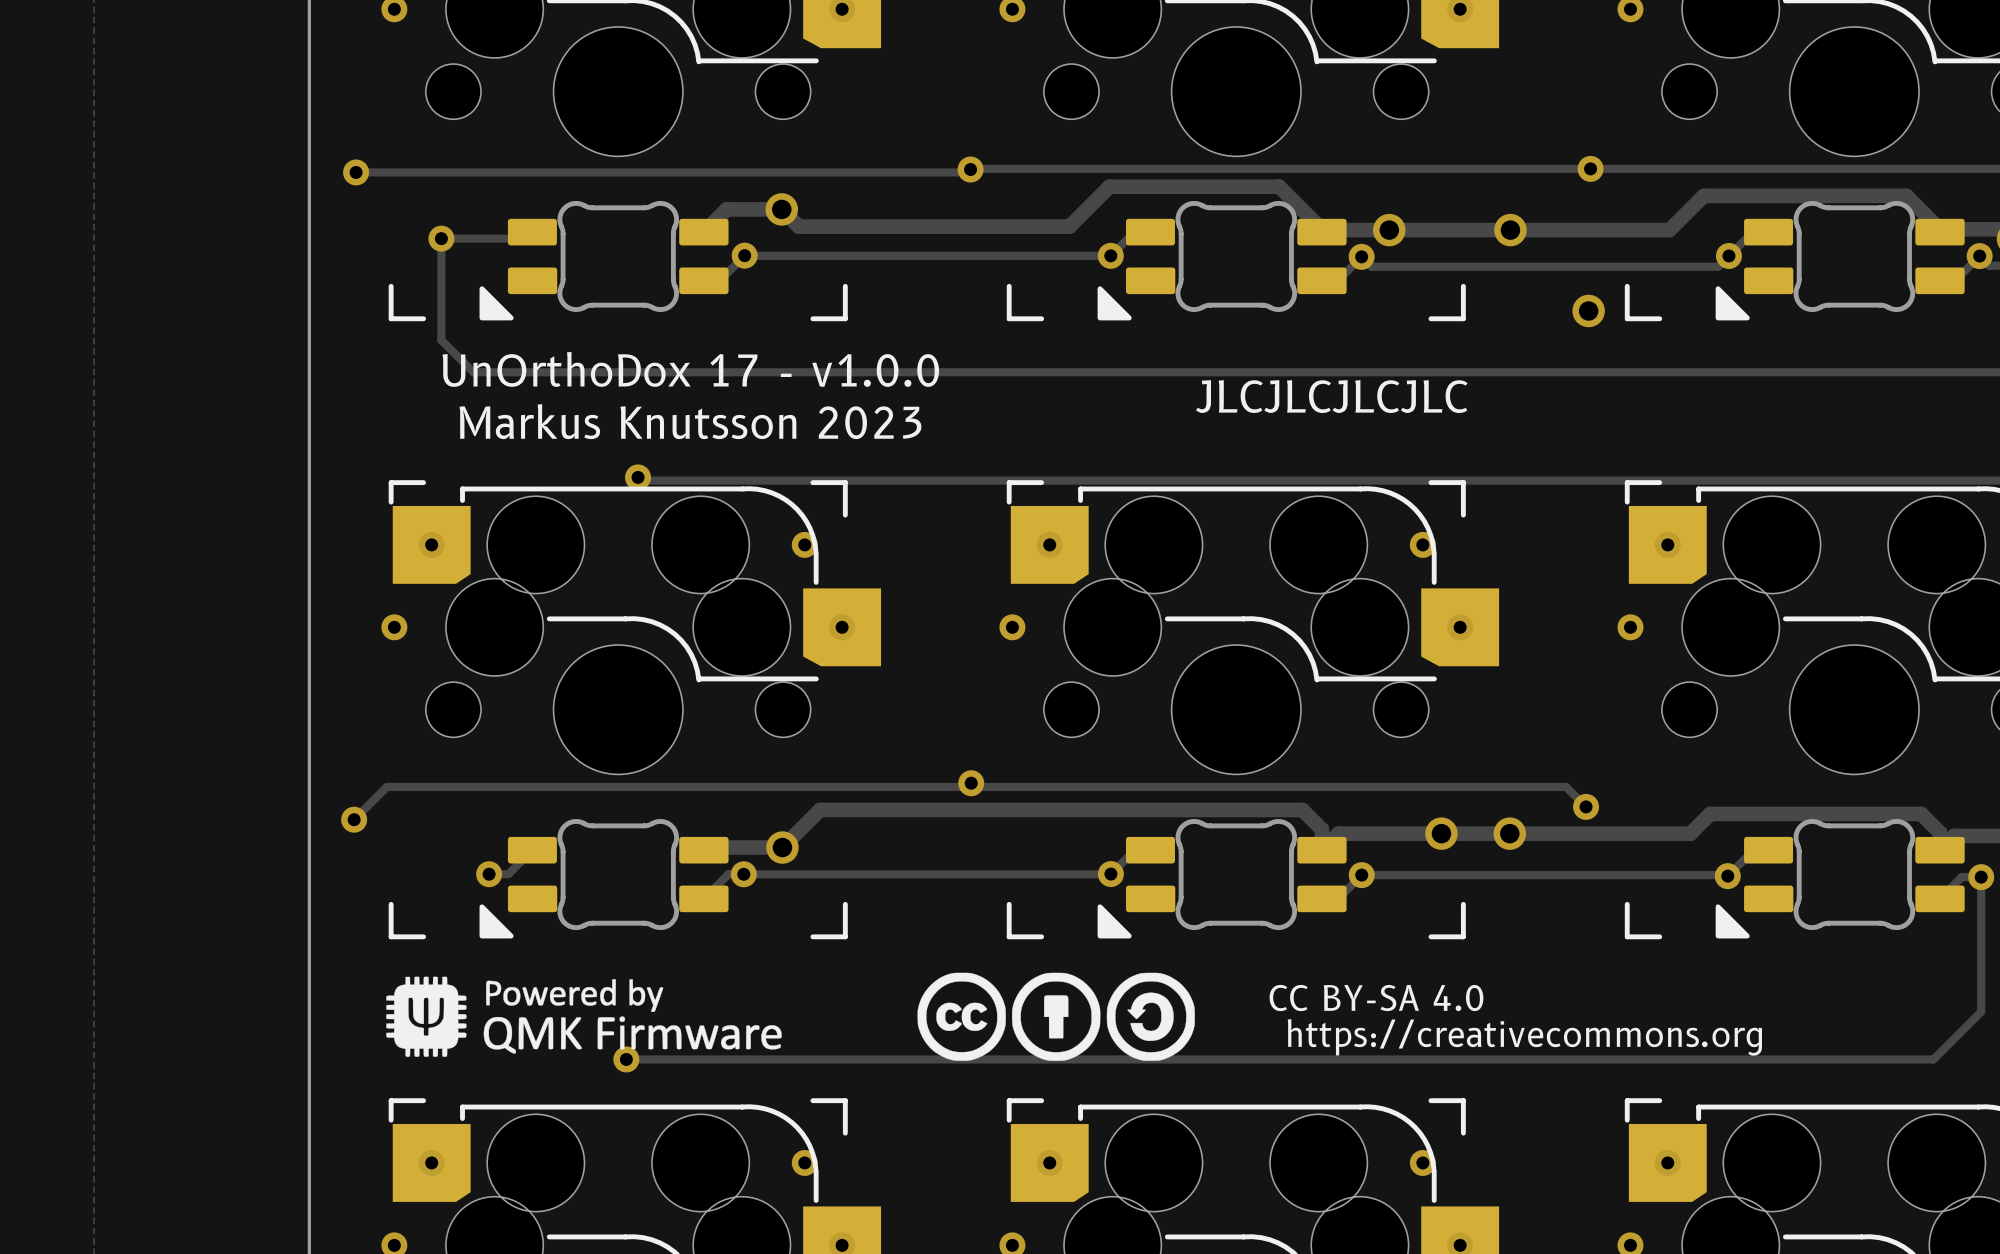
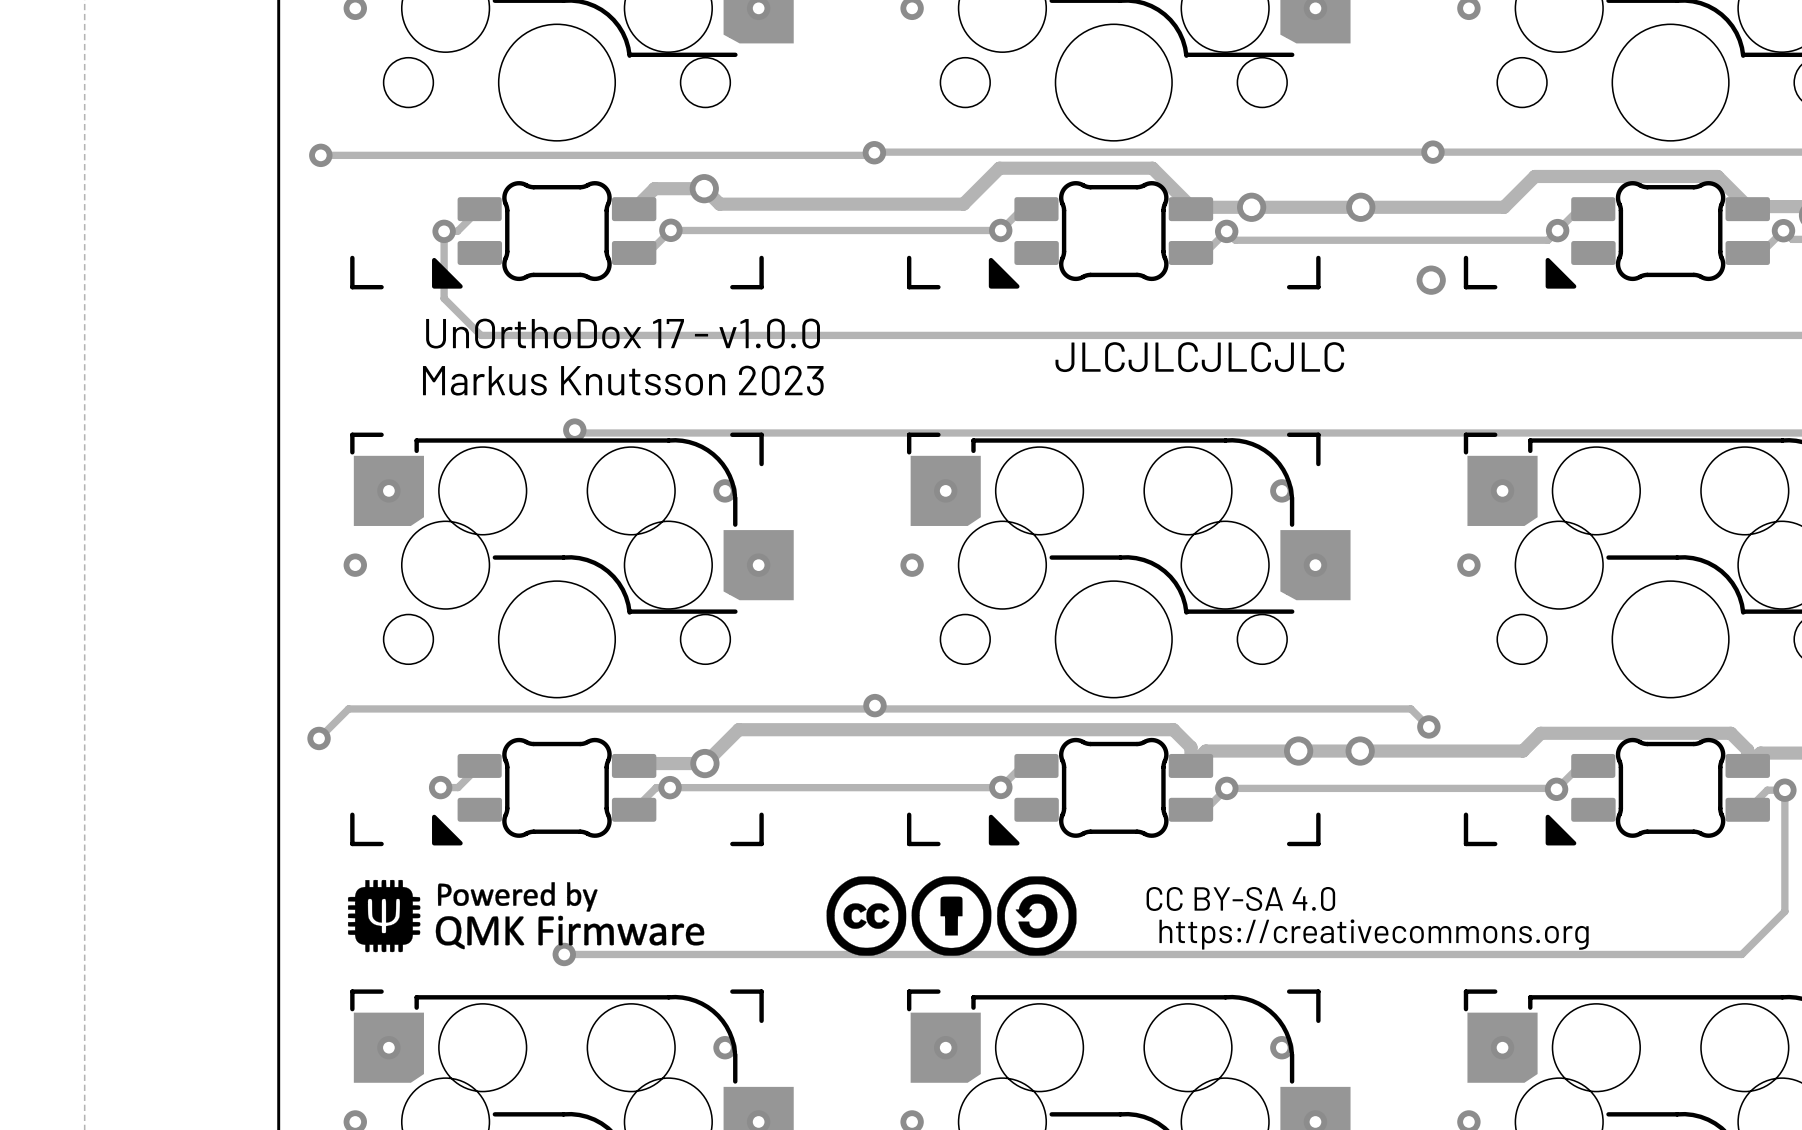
via position: (441, 238) -> (444, 231)
track: (525, 238) (441, 238) (441, 340) (473, 372) (533, 372) -> (473, 214) (457, 231) (444, 231) (444, 298) (480, 335)

